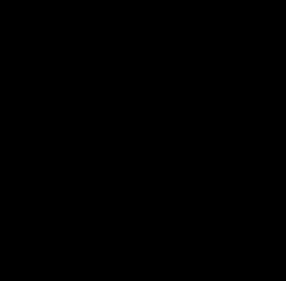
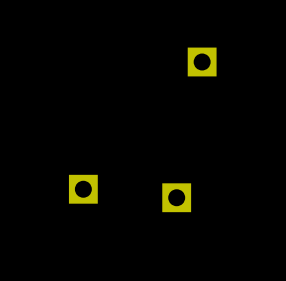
part: none -> (202, 62)
part: none -> (83, 189)
part: none -> (176, 197)

